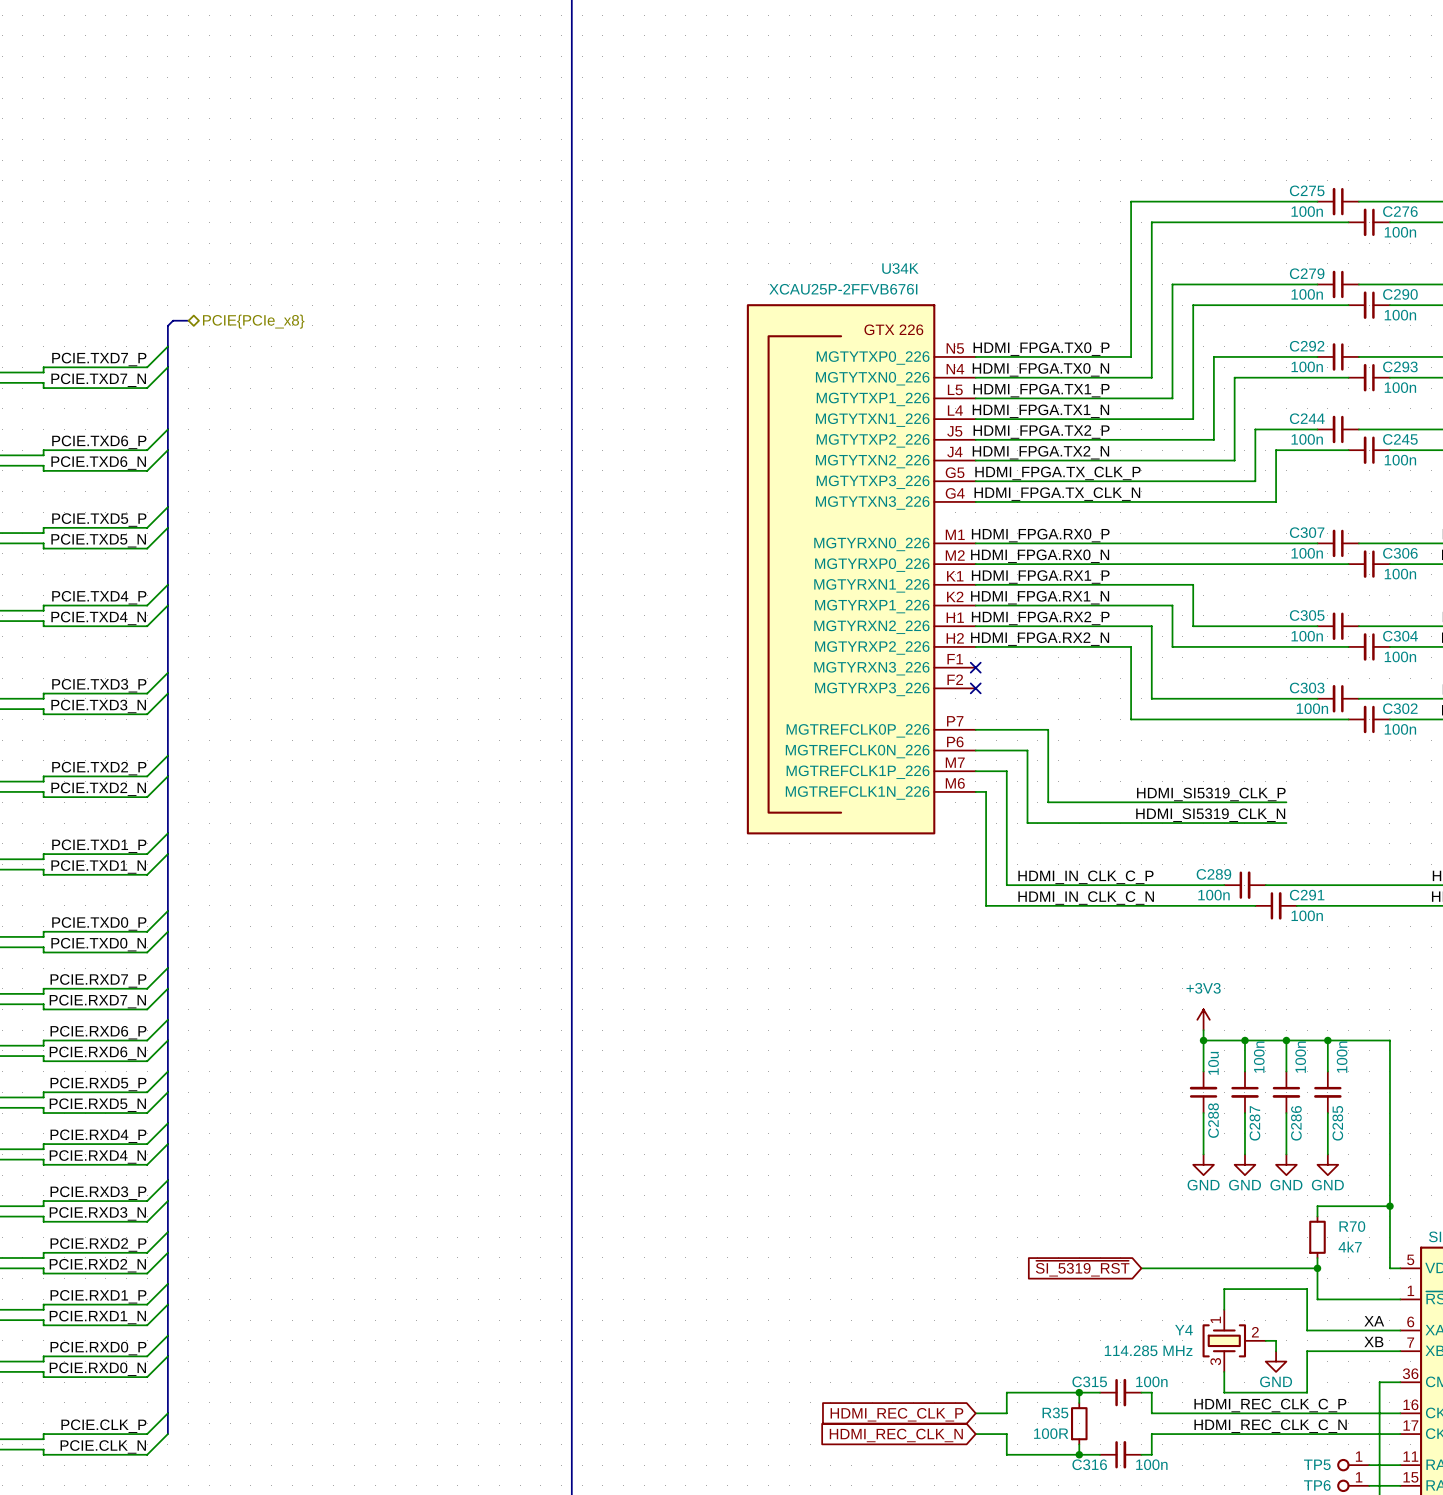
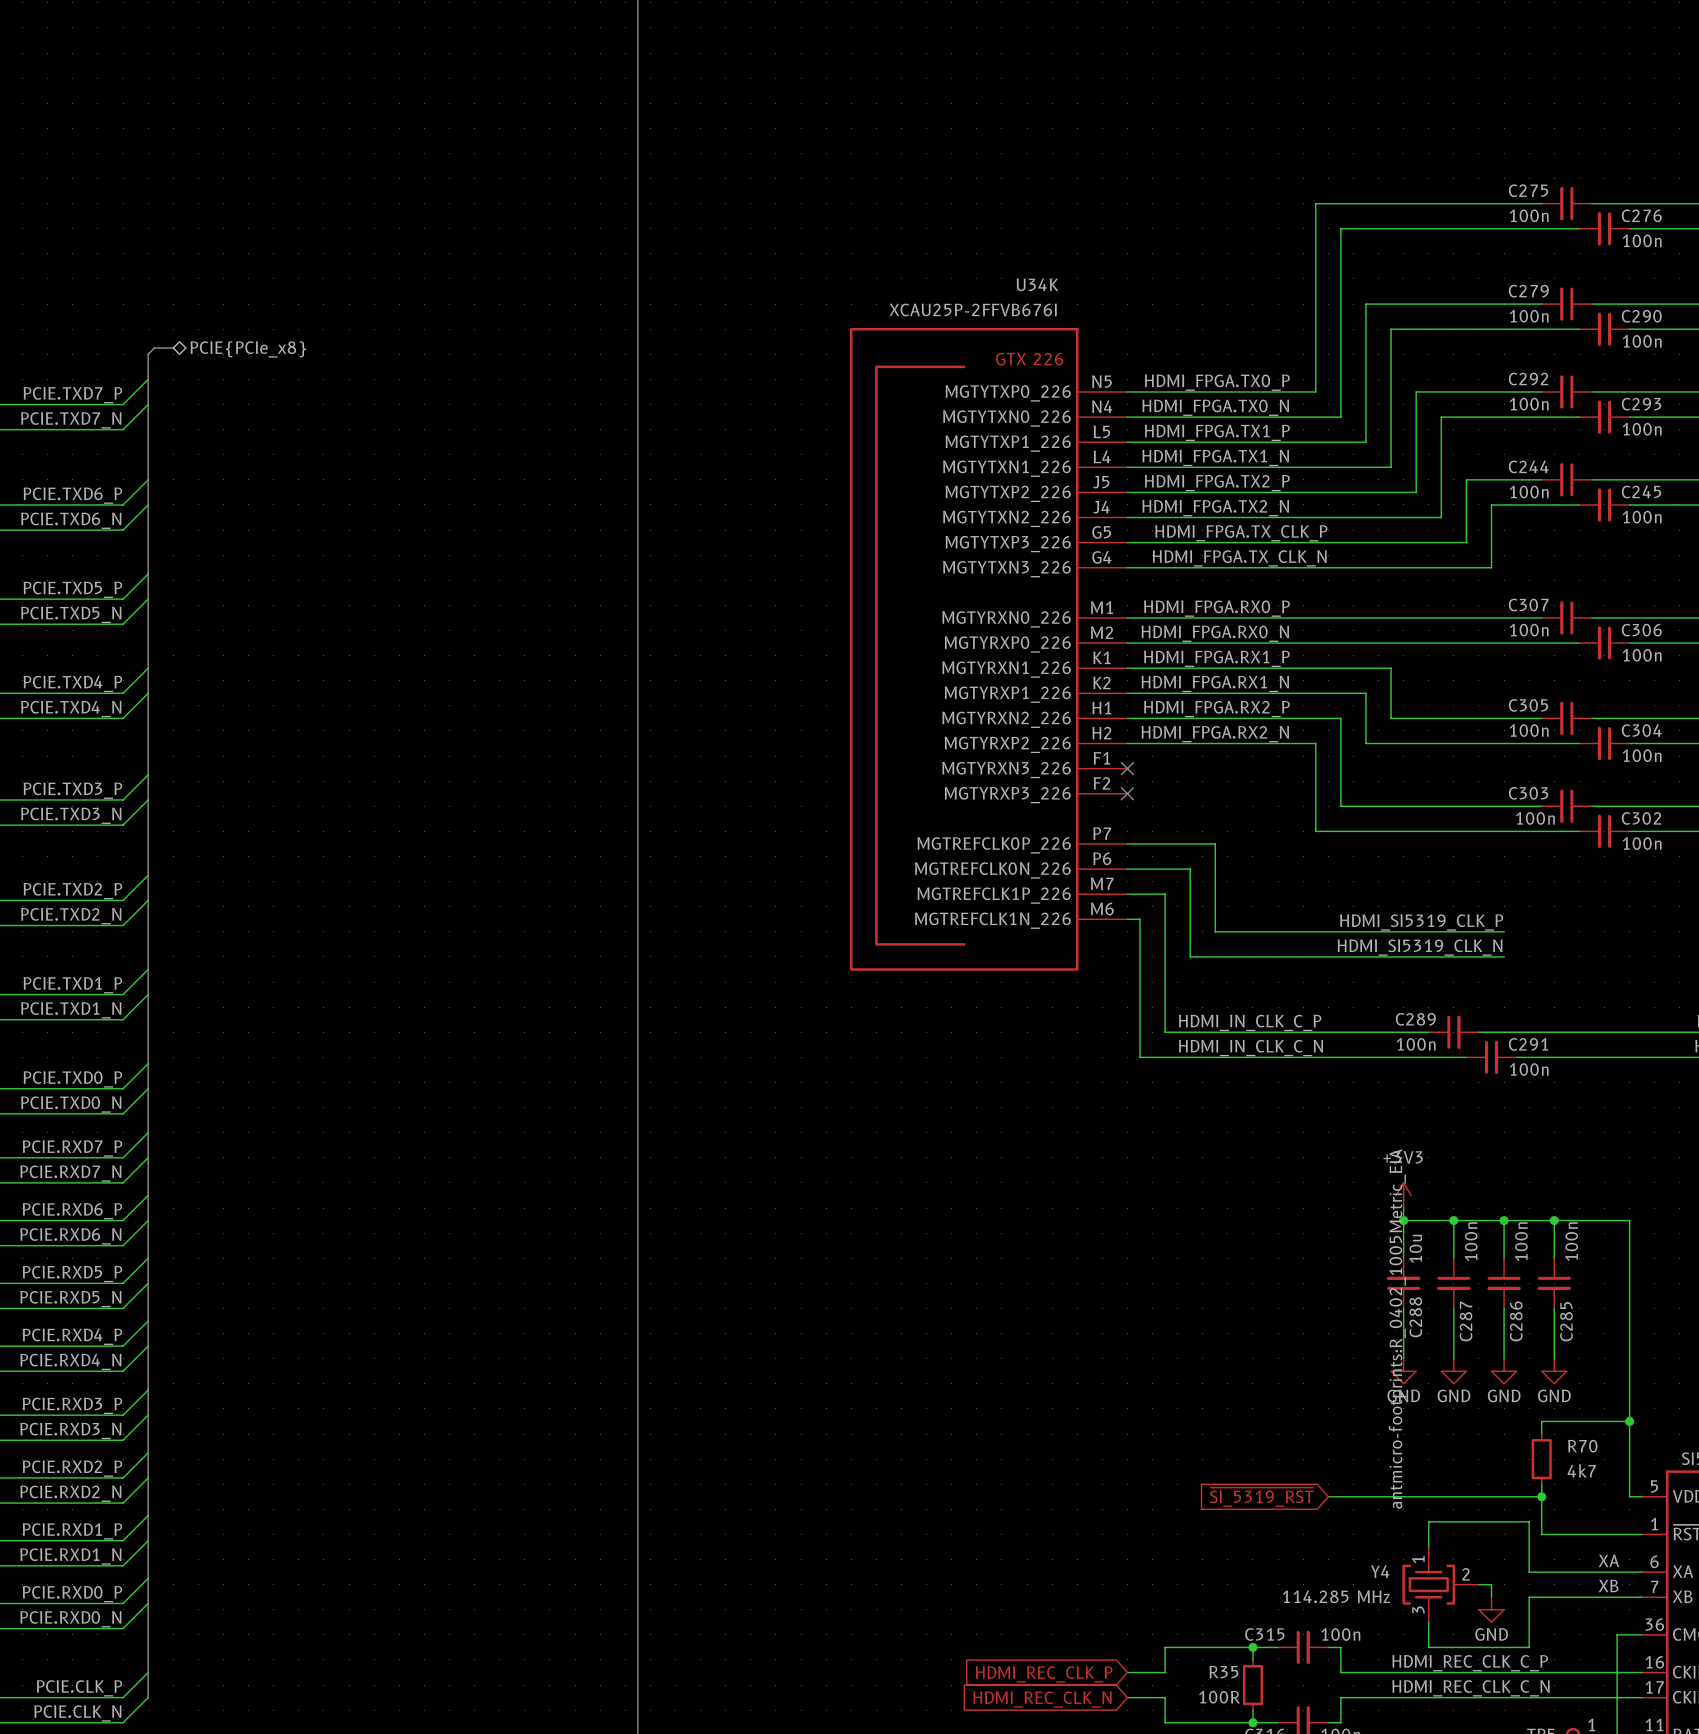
R35 text: none -> antmicro-footprints:R_0402_1005Metric_EIA (1397, 1329)

